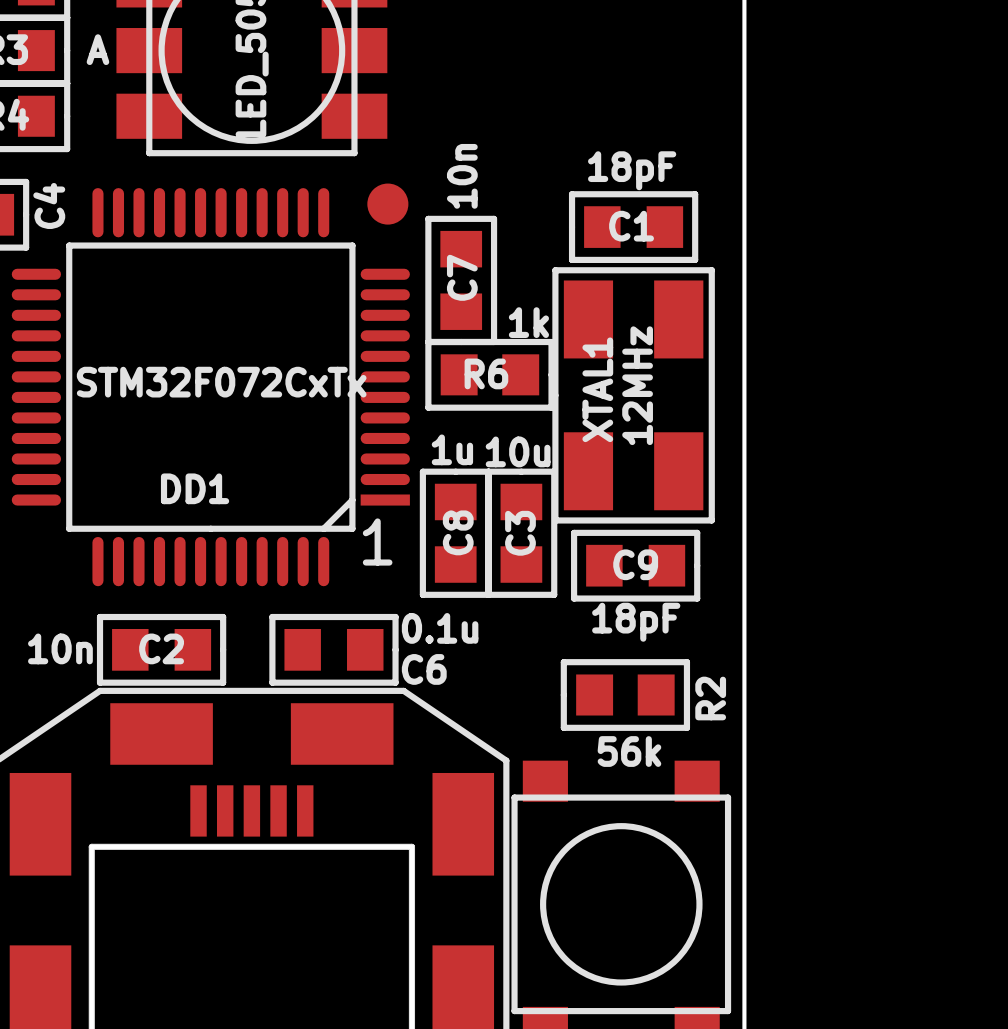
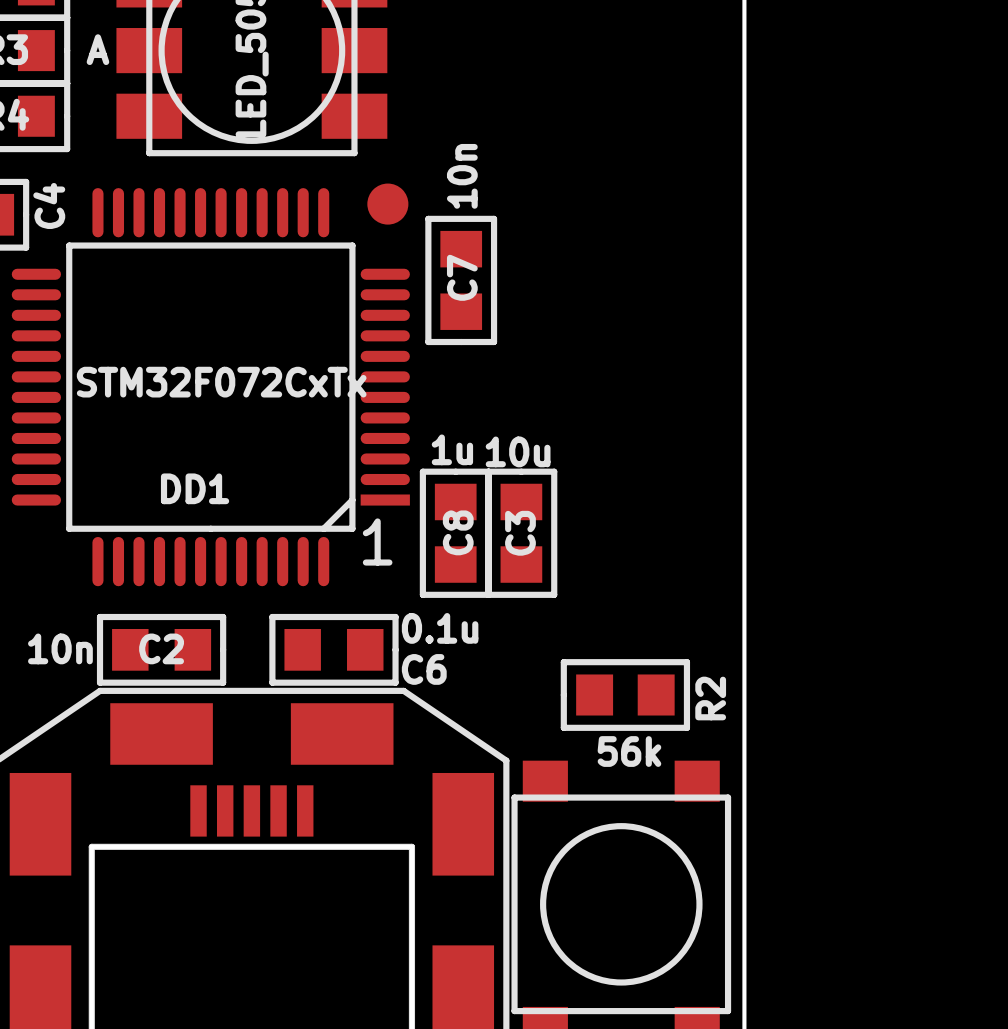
C1: 18pF (633, 227) -> none
R6: 1k (489, 374) -> none
XTAL1: 12MHz (633, 395) -> none
C9: 18pF (635, 565) -> none

